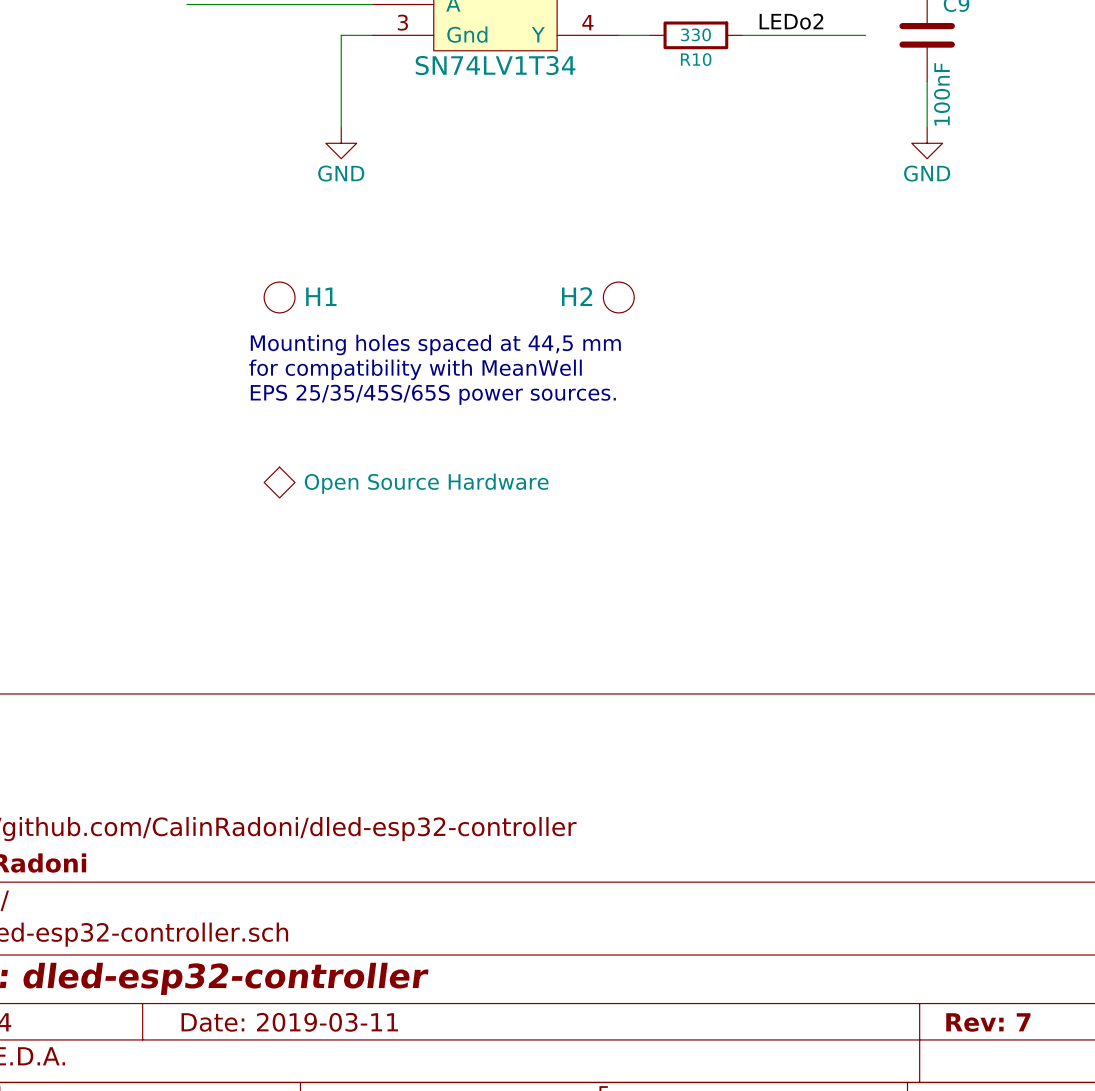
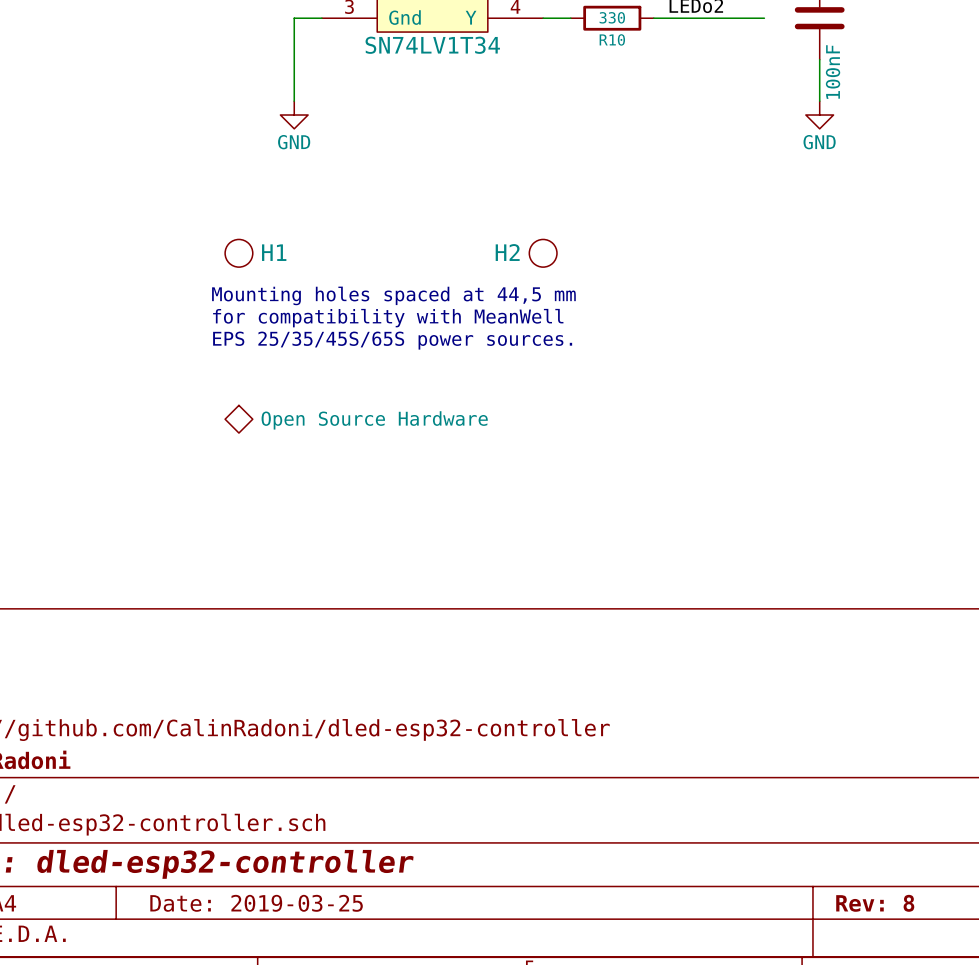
title block: Date: 2019-03-11 (289, 1022) -> Date: 2019-03-25 (256, 903)
title block: Rev: 7 (988, 1022) -> Rev: 8 (875, 903)

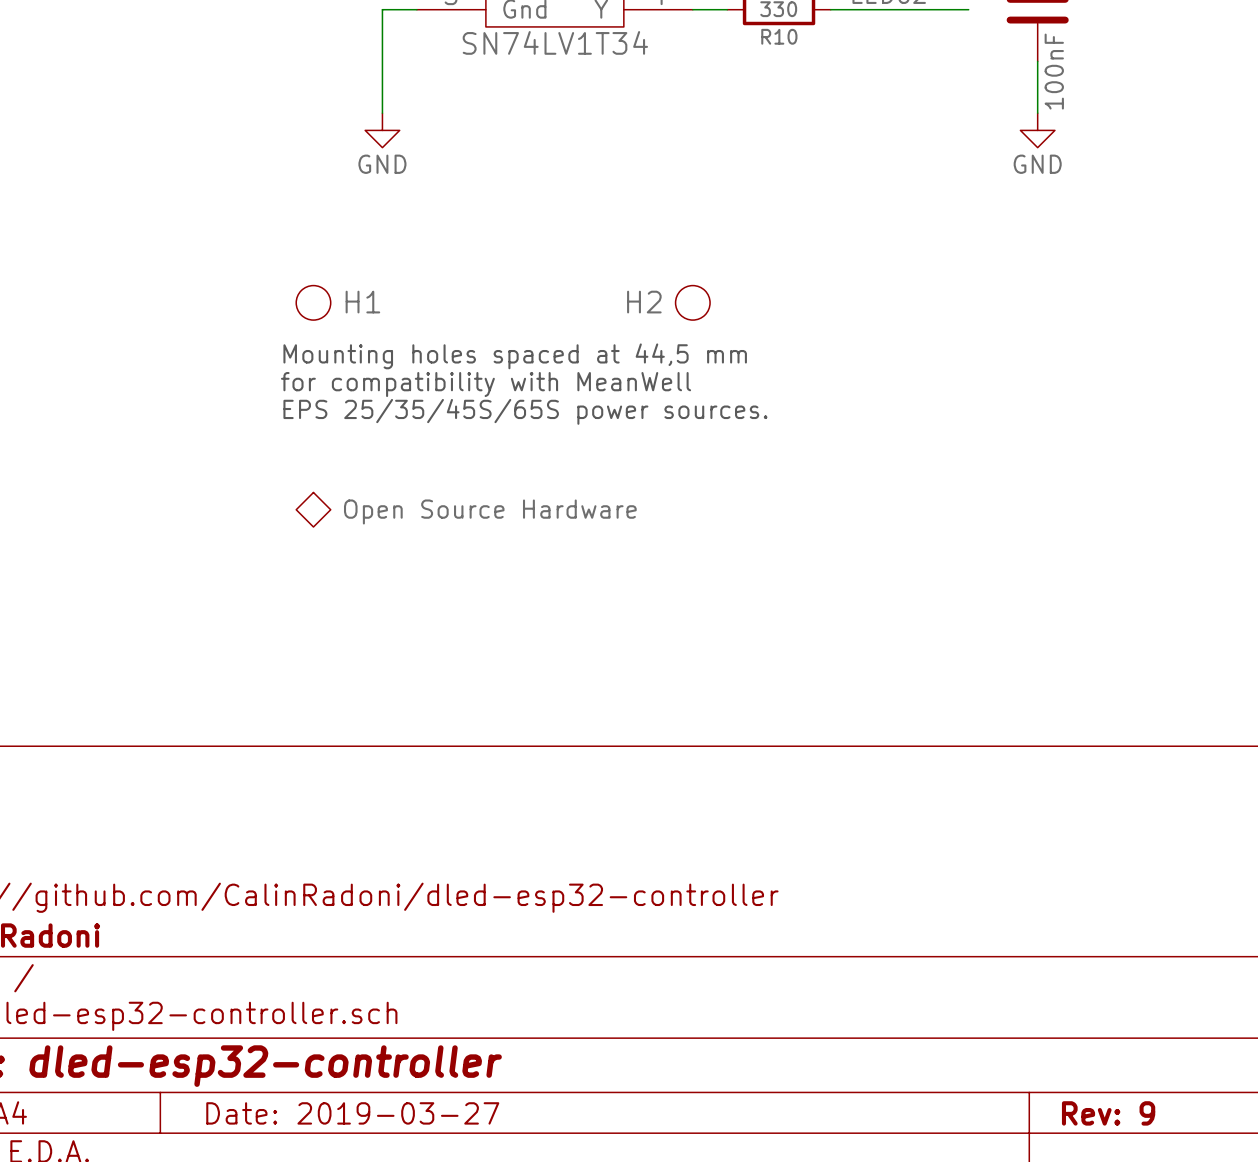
title block: Date: 2019-03-25 (256, 903) -> Date: 2019-03-27 (352, 1113)
title block: Rev: 8 (875, 903) -> Rev: 9 (1108, 1113)

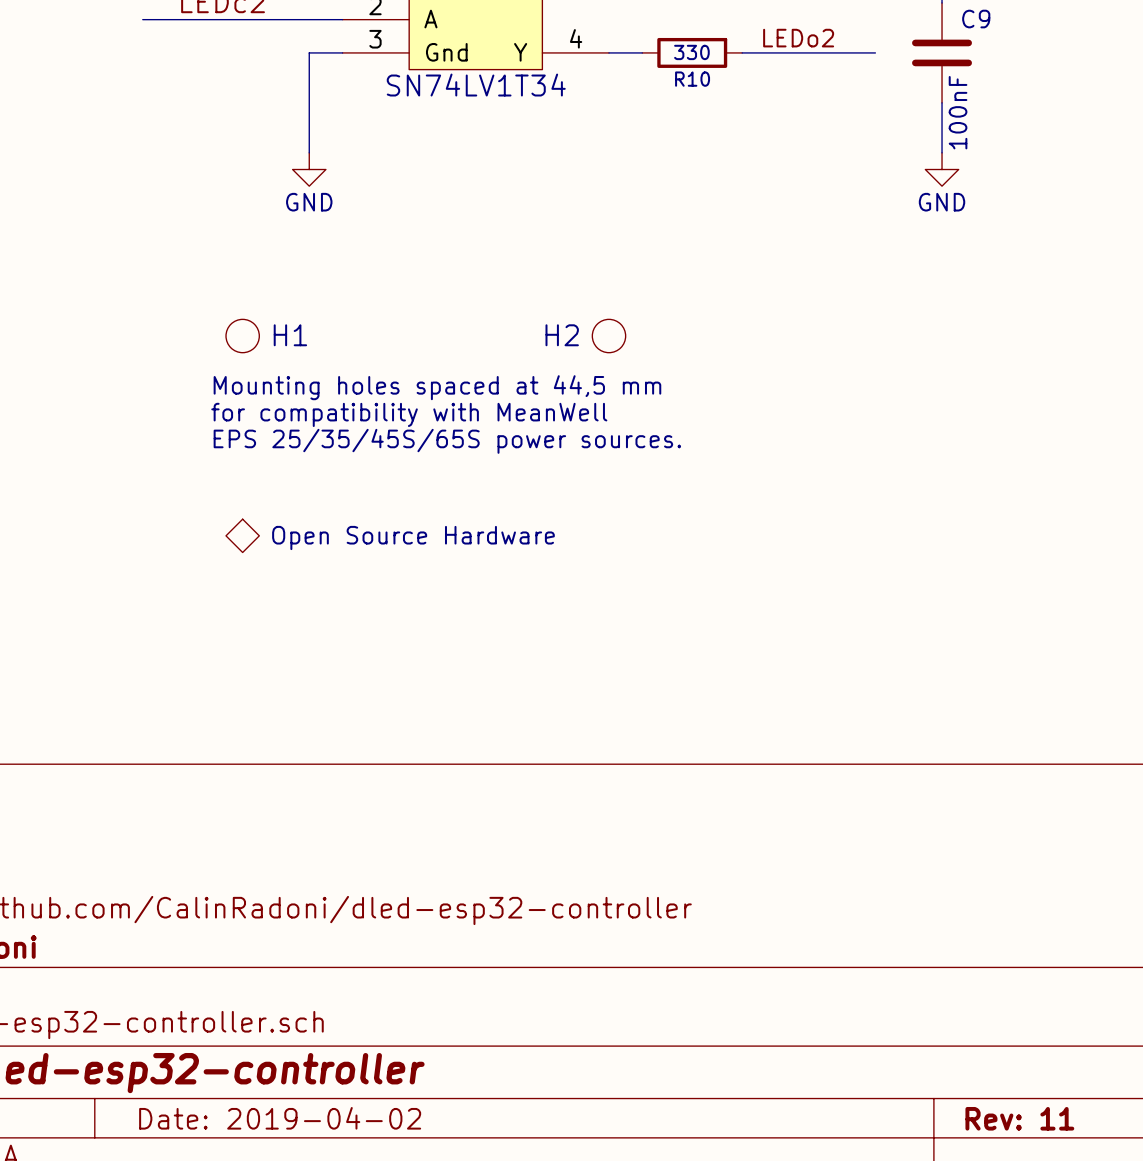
title block: Date: 2019-03-27 (352, 1113) -> Date: 2019-04-02 (280, 1118)
title block: Rev: 9 (1108, 1113) -> Rev: 11 (1019, 1118)

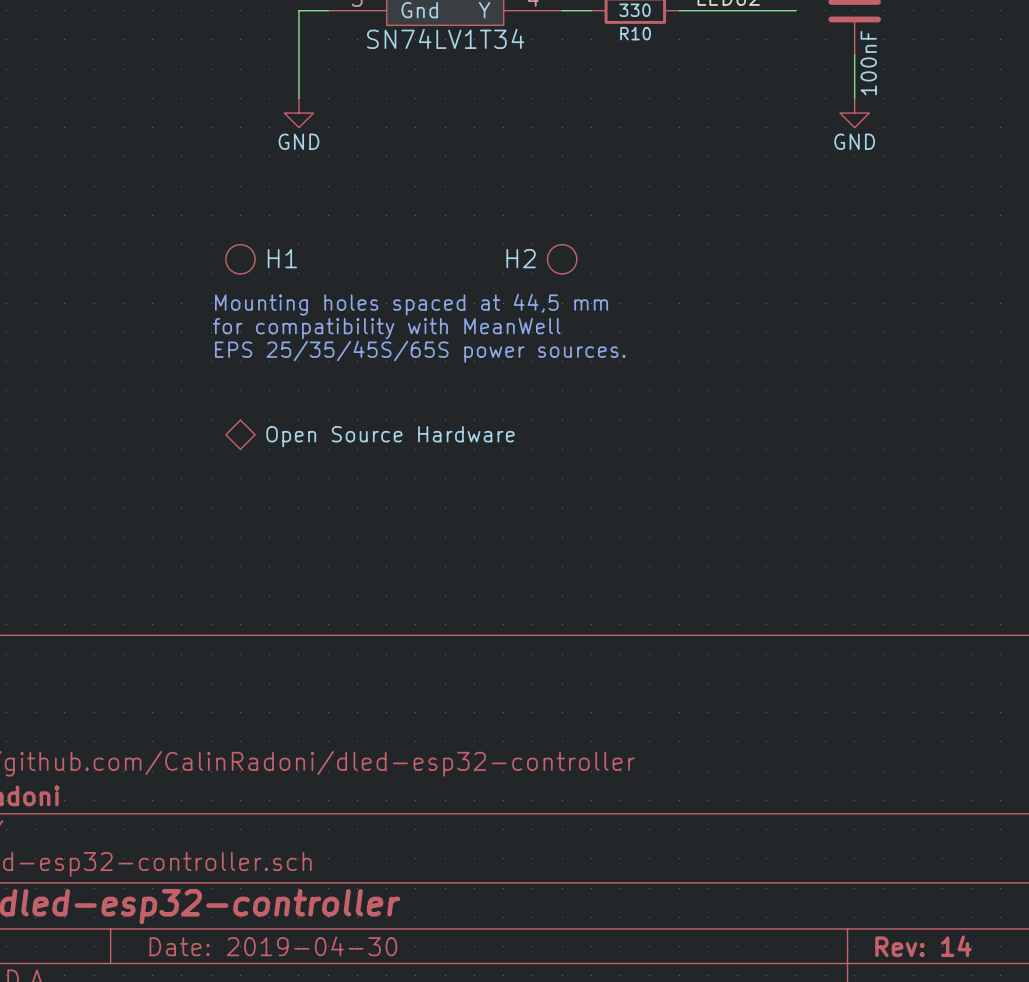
title block: Date: 2019-04-02 (280, 1118) -> Date: 2019-04-30 (273, 946)
title block: Rev: 11 (1019, 1118) -> Rev: 14 (923, 946)

